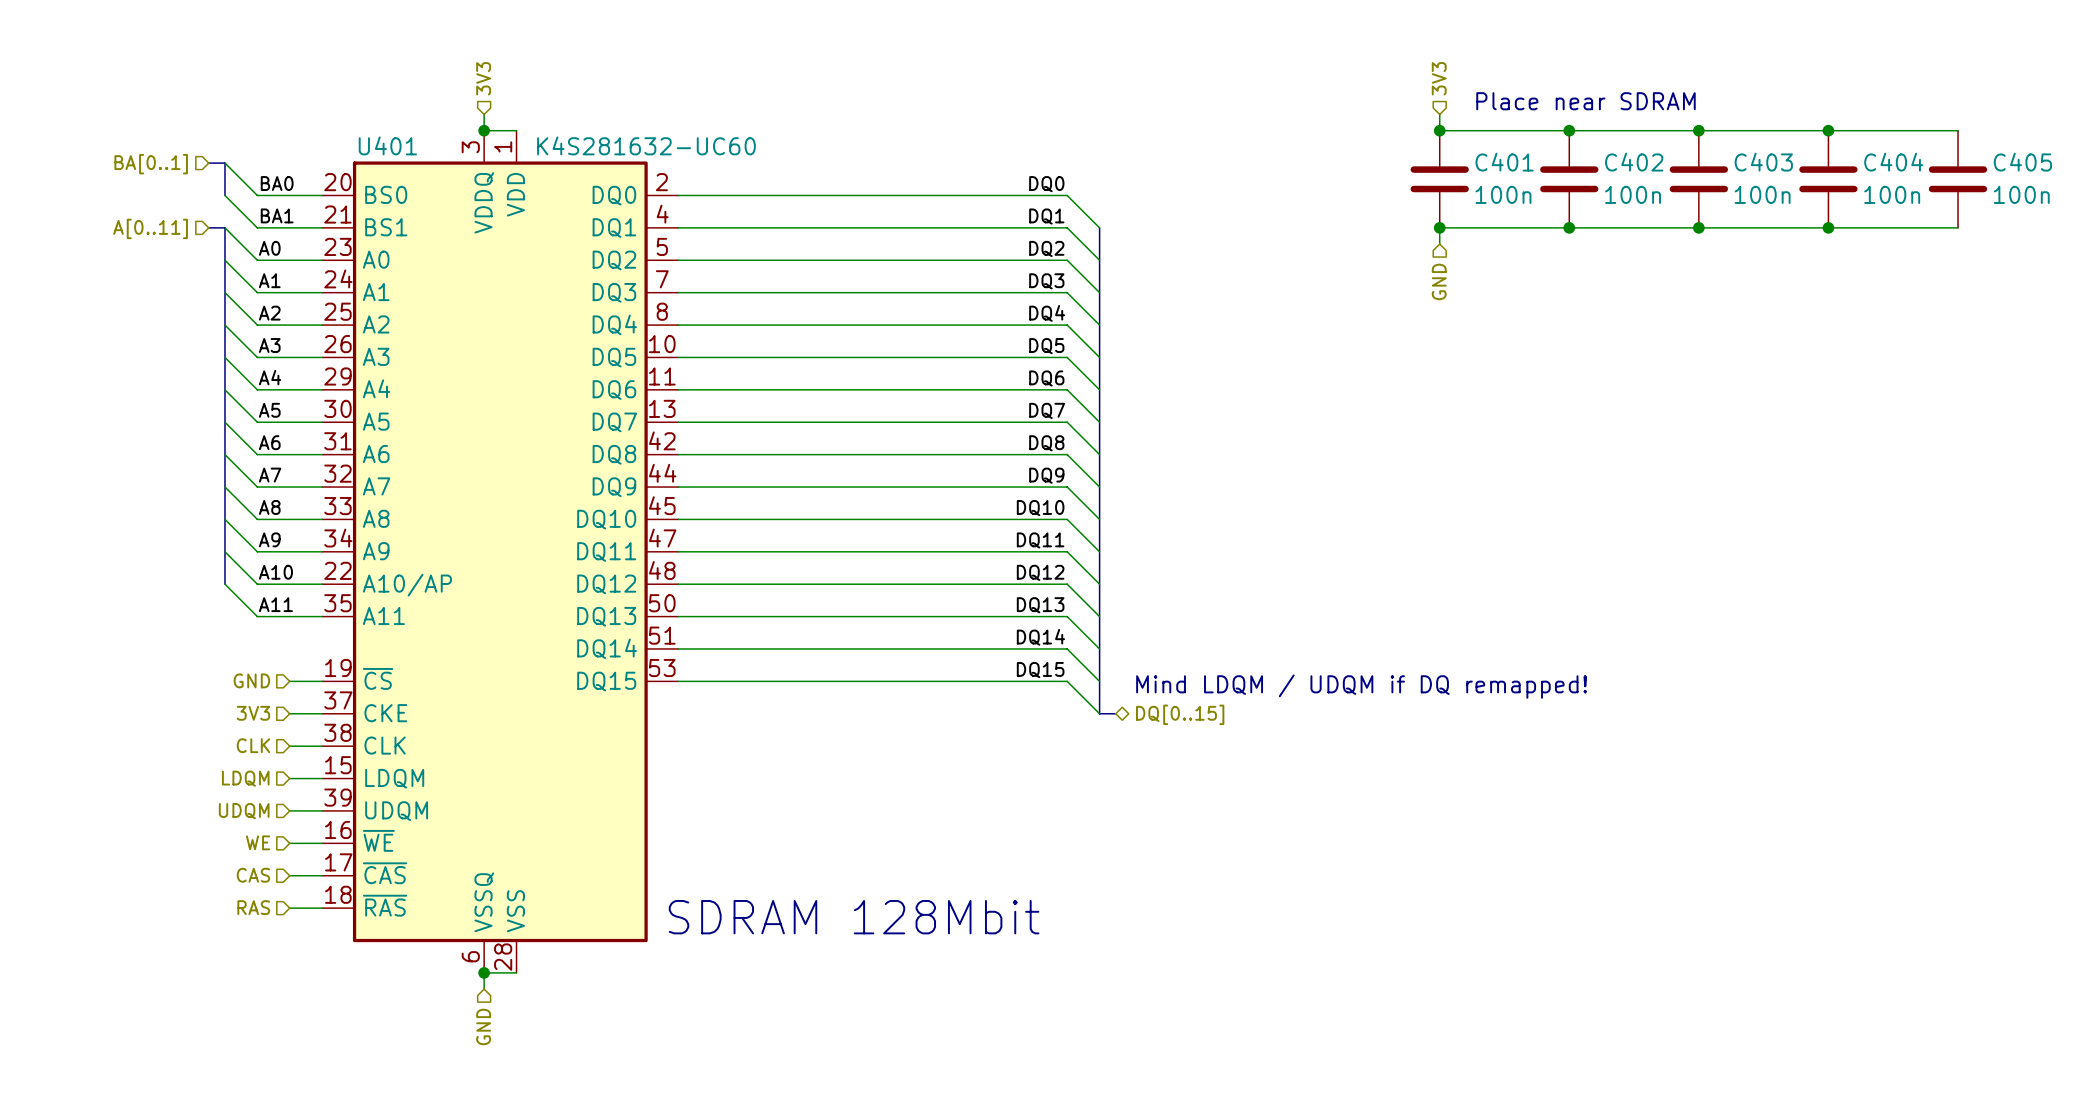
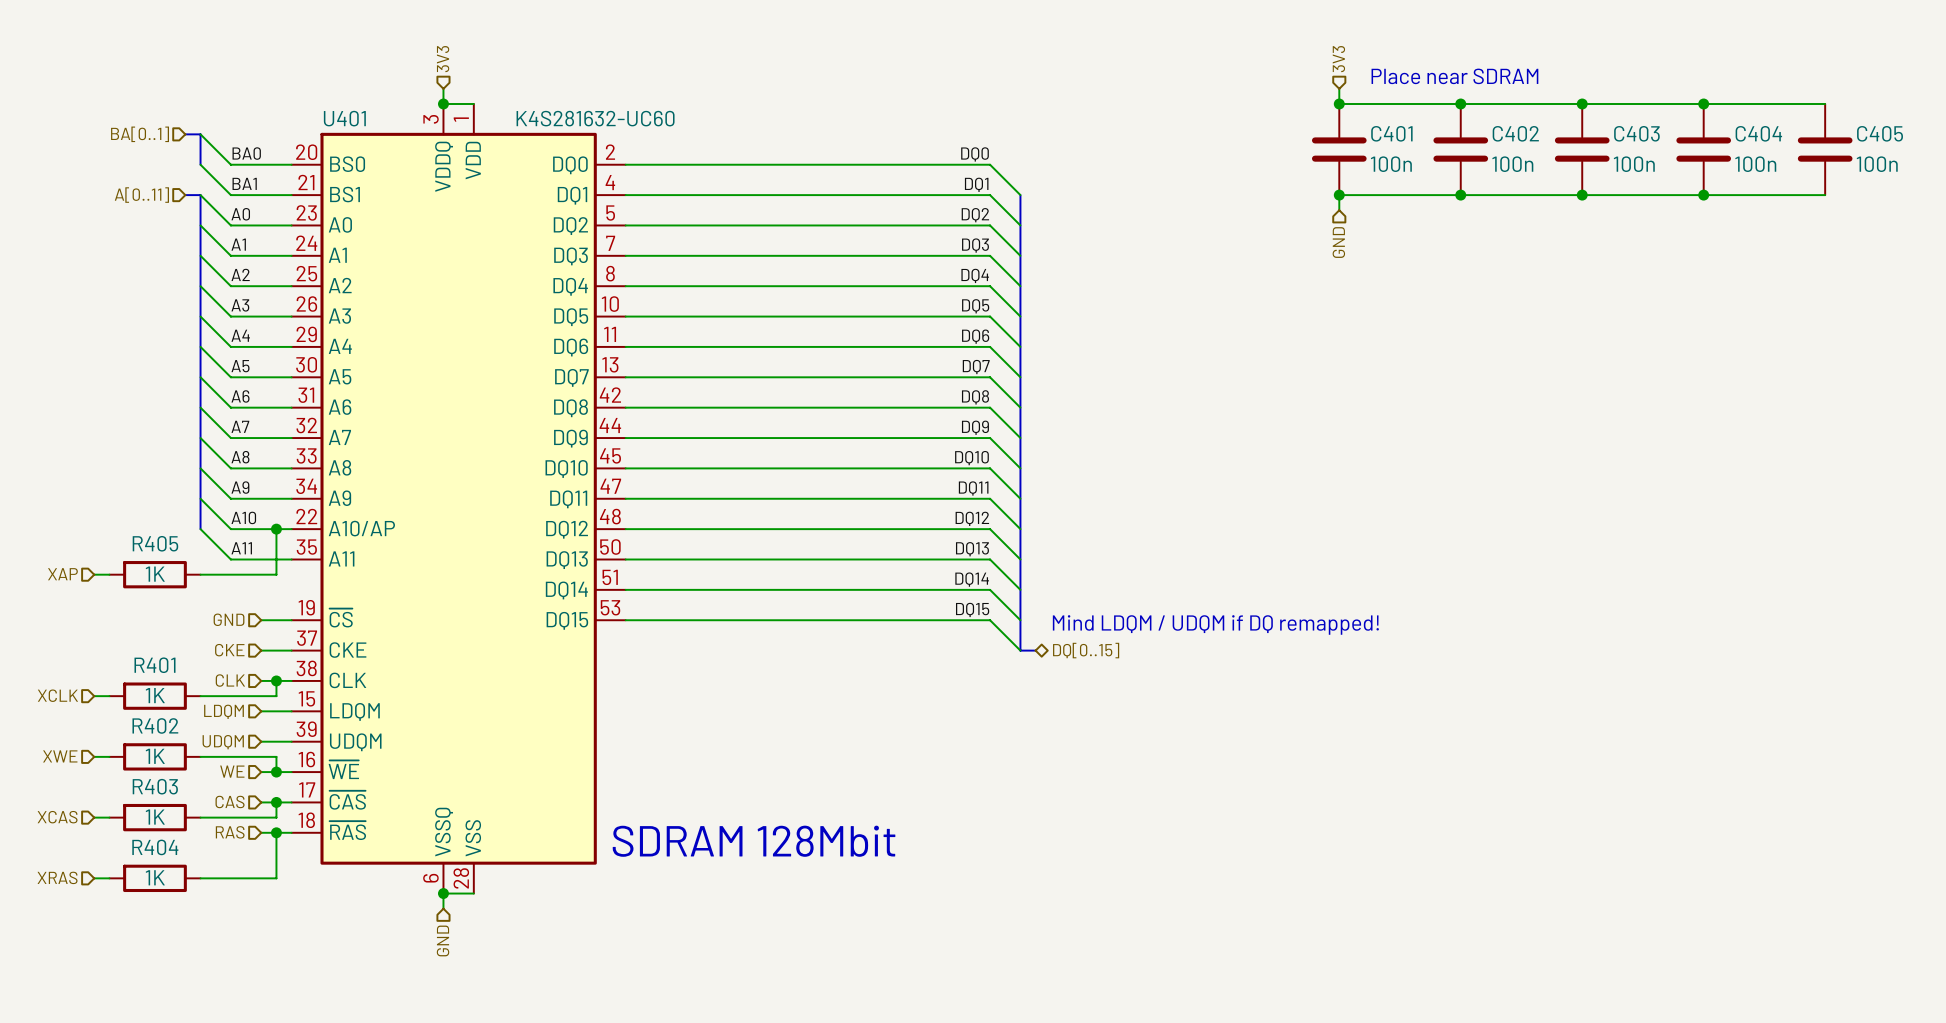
wire: none -> (276, 529) (276, 574) (200, 574)
junction: none -> (276, 529)
hierarchical label: none -> XAP (62, 574)
wire: none -> (94, 574) (109, 574)
R405: none -> 1K (154, 574)
hierarchical label: 3V3 (253, 713) -> CKE (229, 650)
wire: none -> (276, 680) (276, 696) (200, 696)
junction: none -> (276, 680)
hierarchical label: none -> XCLK (57, 695)
wire: none -> (94, 696) (109, 696)
R401: none -> 1K (154, 696)
hierarchical label: none -> XWE (60, 756)
wire: none -> (94, 756) (109, 756)
R402: none -> 1K (154, 756)
wire: none -> (200, 756) (276, 756) (276, 772)
junction: none -> (276, 772)
wire: none -> (276, 802) (276, 817) (200, 817)
junction: none -> (276, 802)
hierarchical label: none -> XCAS (57, 817)
wire: none -> (94, 817) (109, 817)
R403: none -> 1K (154, 817)
wire: none -> (276, 832) (276, 878) (200, 878)
junction: none -> (276, 832)
hierarchical label: none -> XRAS (57, 877)
wire: none -> (94, 878) (109, 878)
R404: none -> 1K (154, 878)

